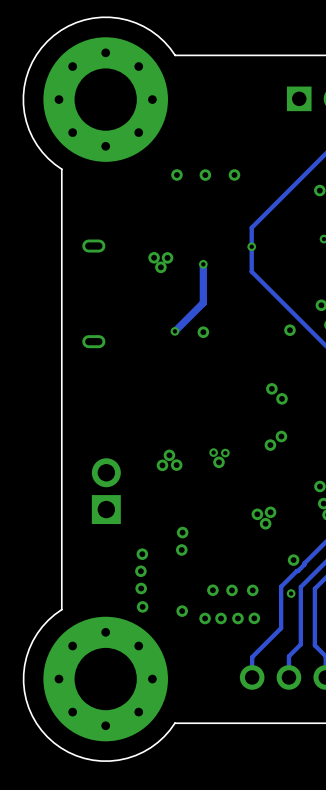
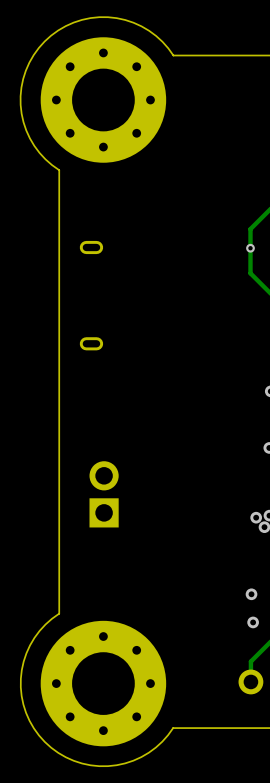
via: (176, 174) -> none
via: (234, 174) -> none
via: (205, 175) -> none
via: (154, 257) -> none
via: (167, 257) -> none
track: (203, 264) (203, 302) (174, 331) -> none
via: (203, 264) -> none
via: (160, 267) -> none
via: (174, 331) -> none
via: (203, 332) -> none
via: (213, 452) -> none
via: (225, 453) -> none
via: (169, 455) -> none
via: (218, 462) -> none
via: (162, 465) -> none
via: (176, 465) -> none
via: (182, 532) -> none
via: (181, 549) -> none
via: (142, 554) -> none
via: (140, 571) -> none
via: (141, 588) -> none
via: (212, 590) -> none
via: (232, 590) -> none
via: (142, 606) -> none
via: (182, 611) -> none
via: (205, 618) -> none
via: (221, 618) -> none
via: (237, 618) -> none

